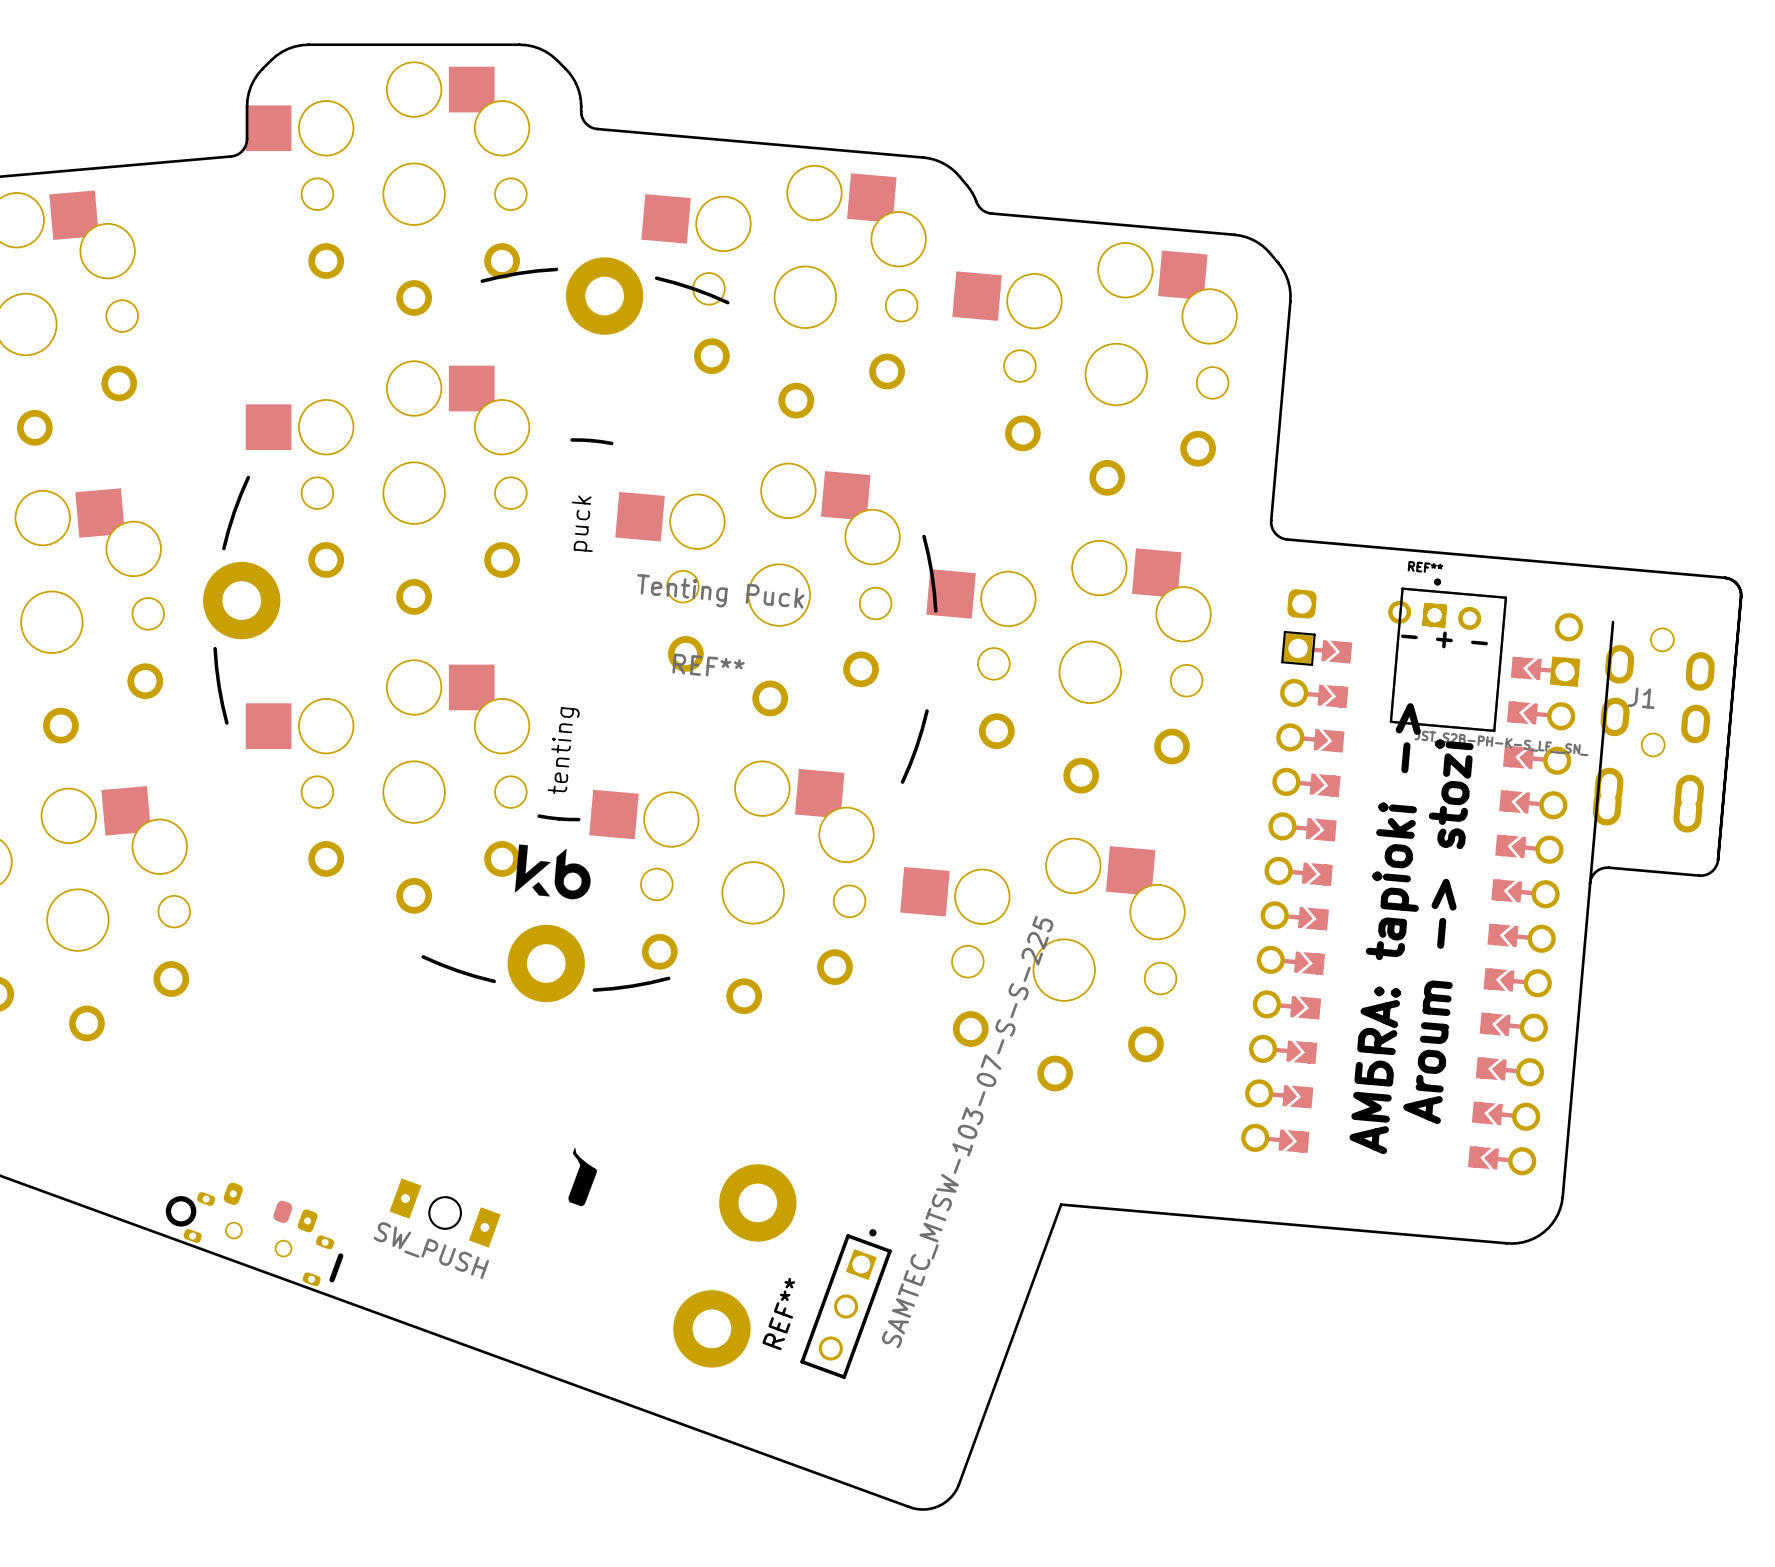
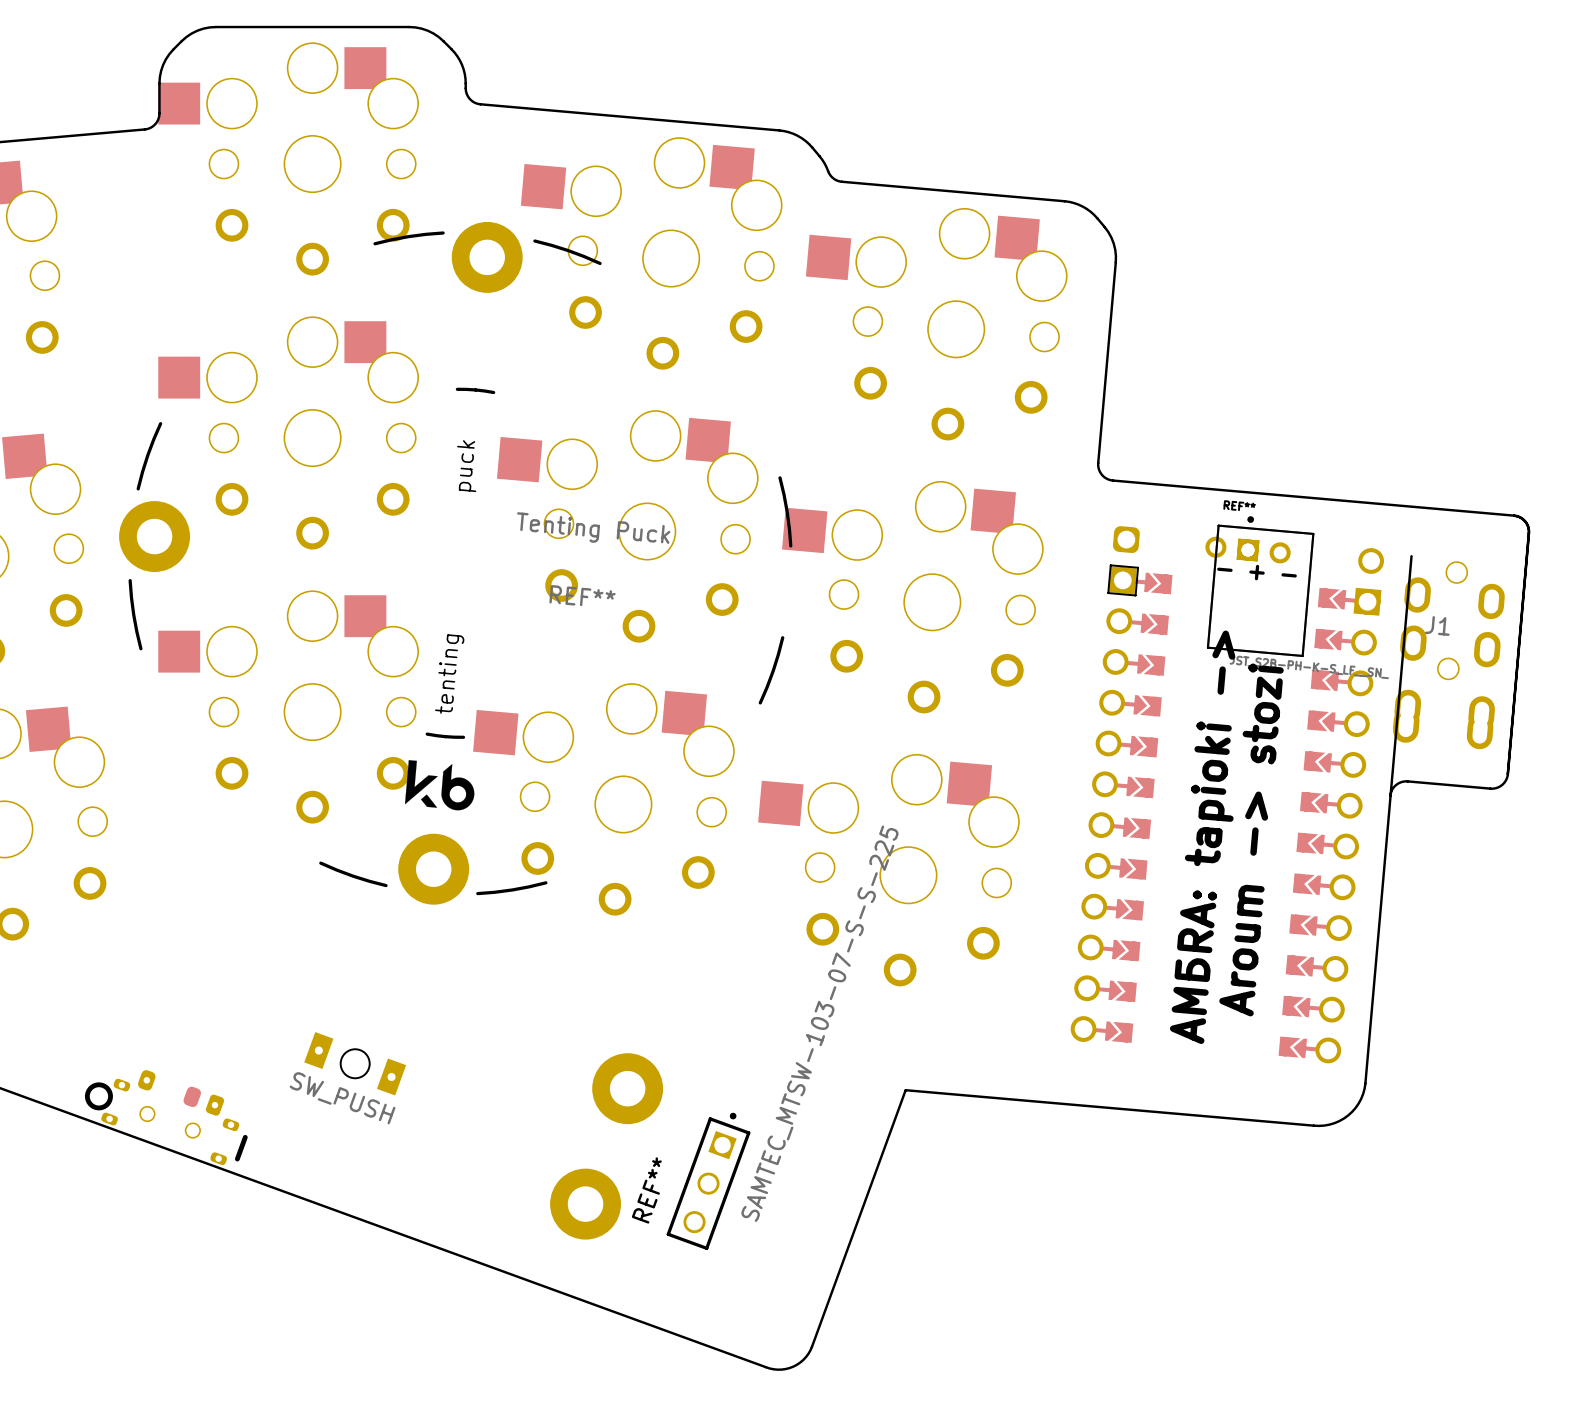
drawing: [568, 1147, 597, 1207] -> none
part position: (445, 1212) -> (355, 1063)

